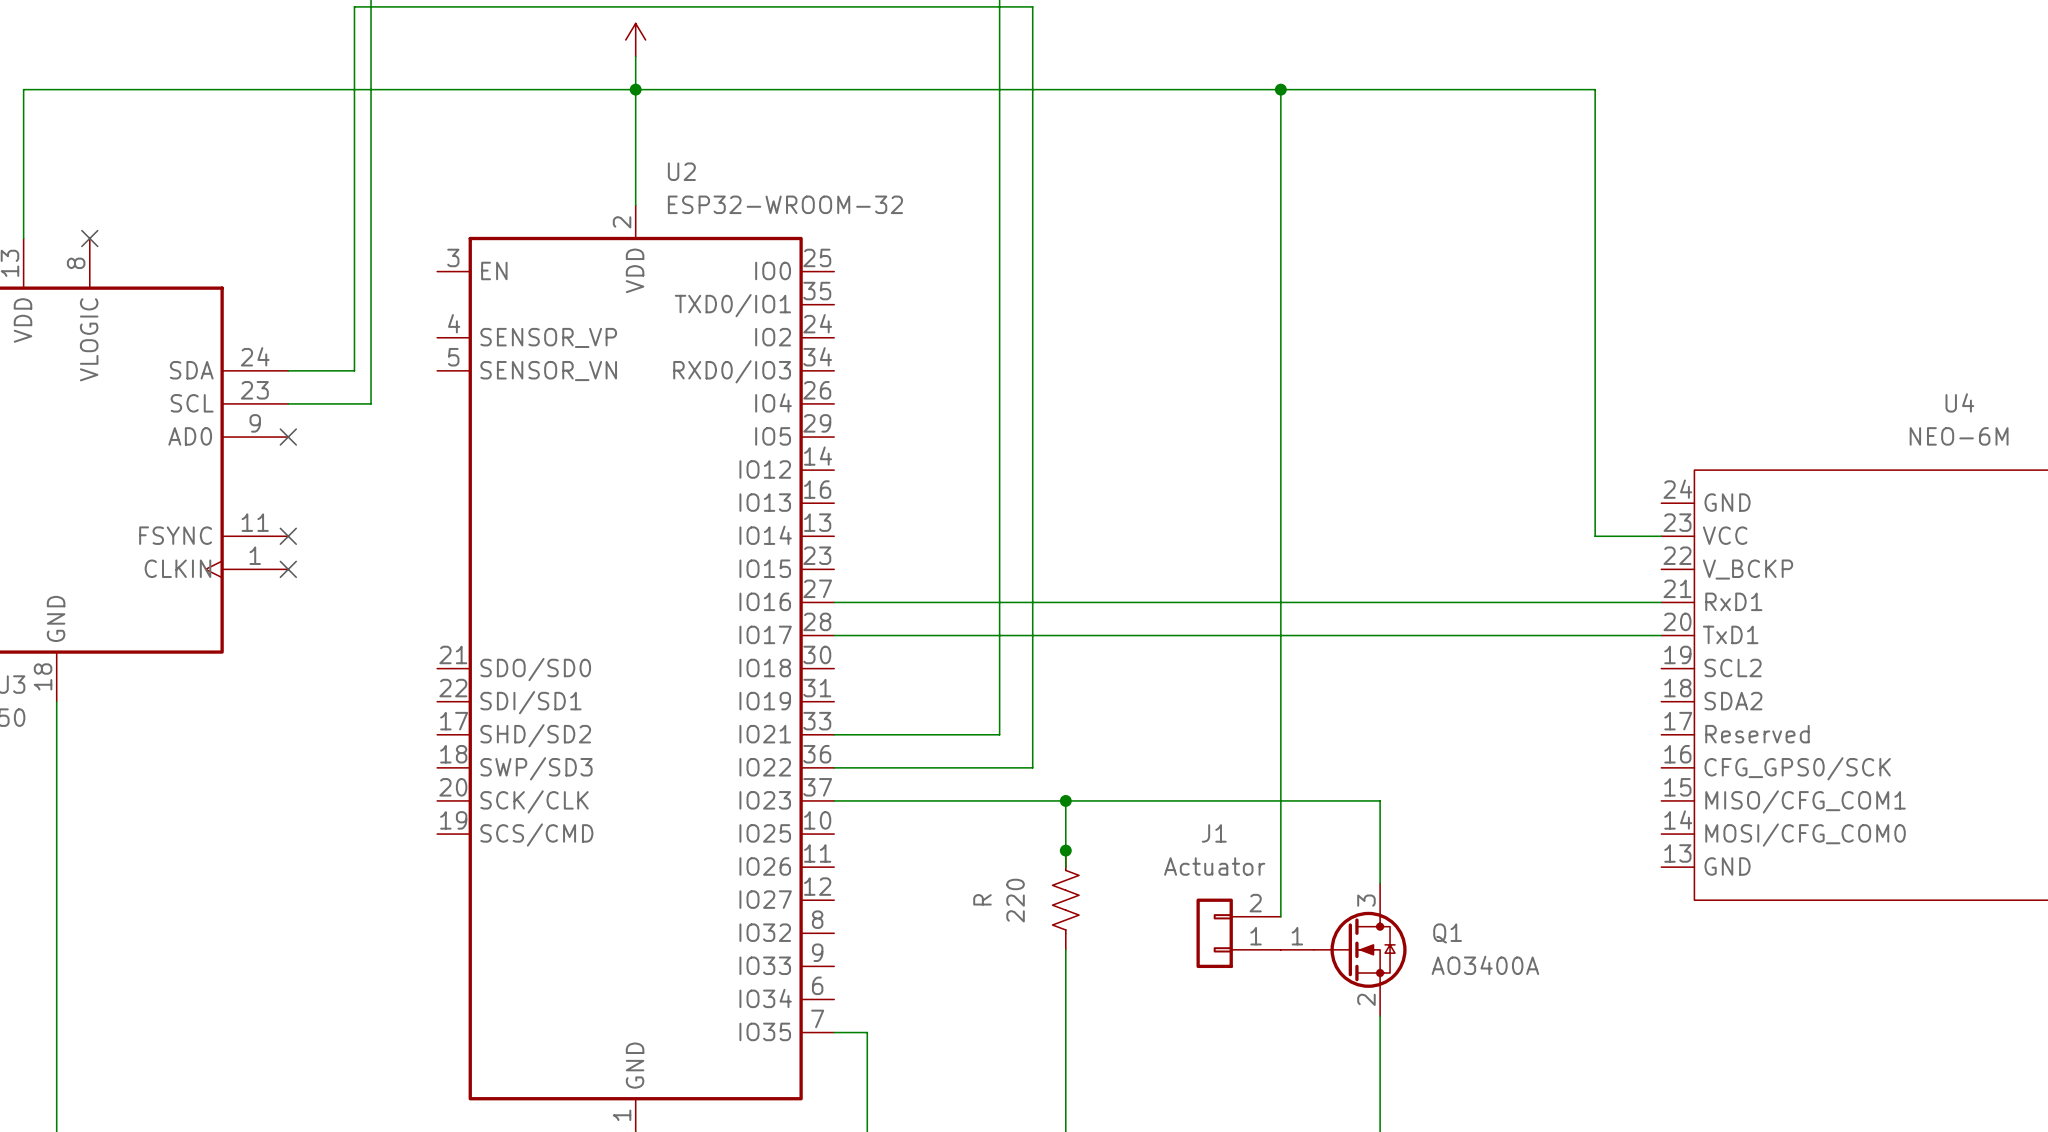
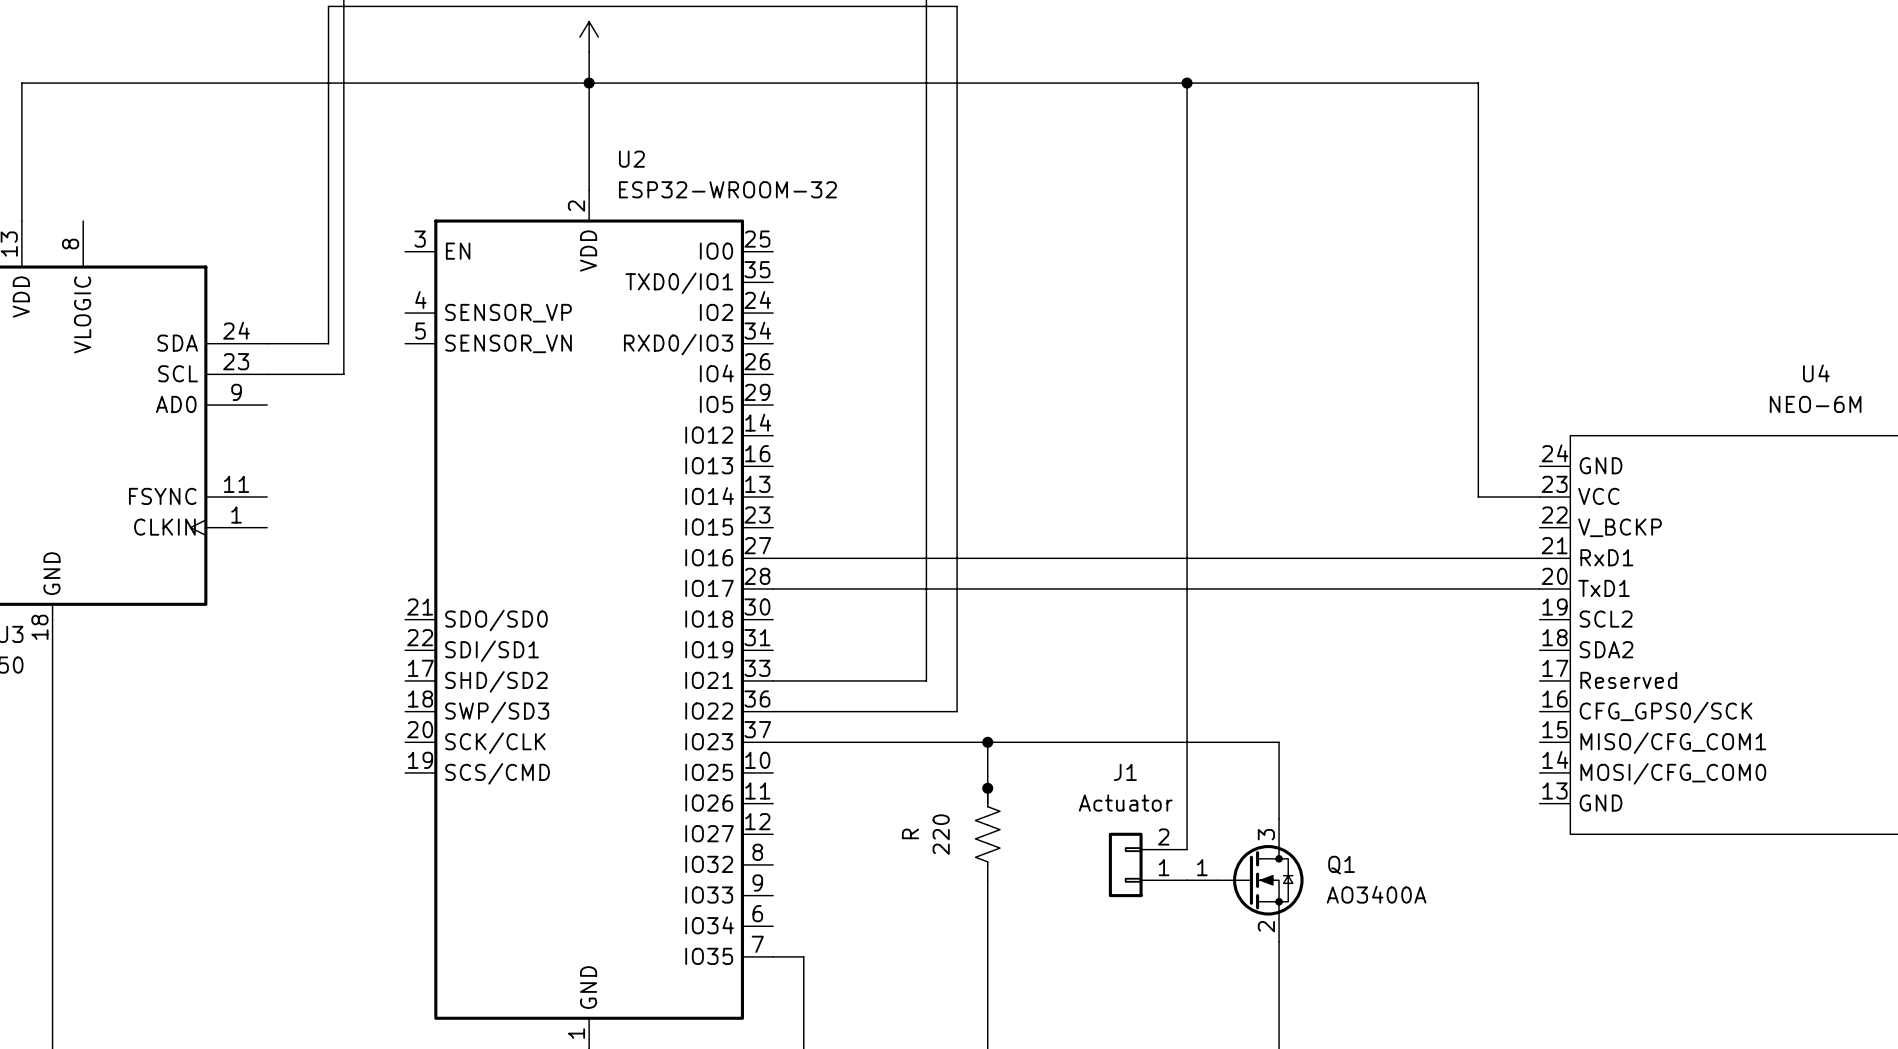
no-connect mark: (89, 238) -> none
no-connect mark: (288, 437) -> none
no-connect mark: (288, 536) -> none
no-connect mark: (288, 569) -> none

